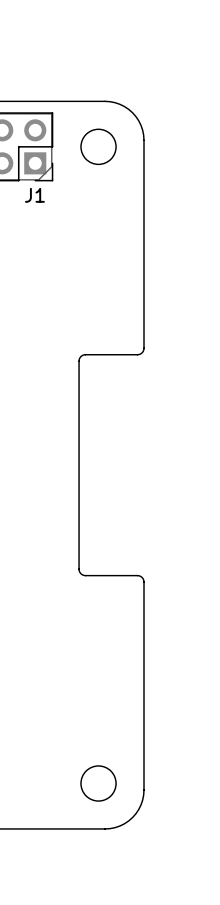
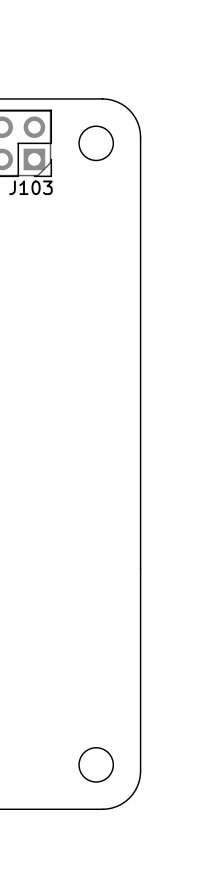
J1 name: J1 (34, 195) -> J103 (30, 187)
board edge: (144, 348) (142, 352) (138, 354) (83, 354) (79, 361) (79, 570) (84, 575) (138, 575) (142, 577) (144, 582) -> (140, 339) (140, 568)

